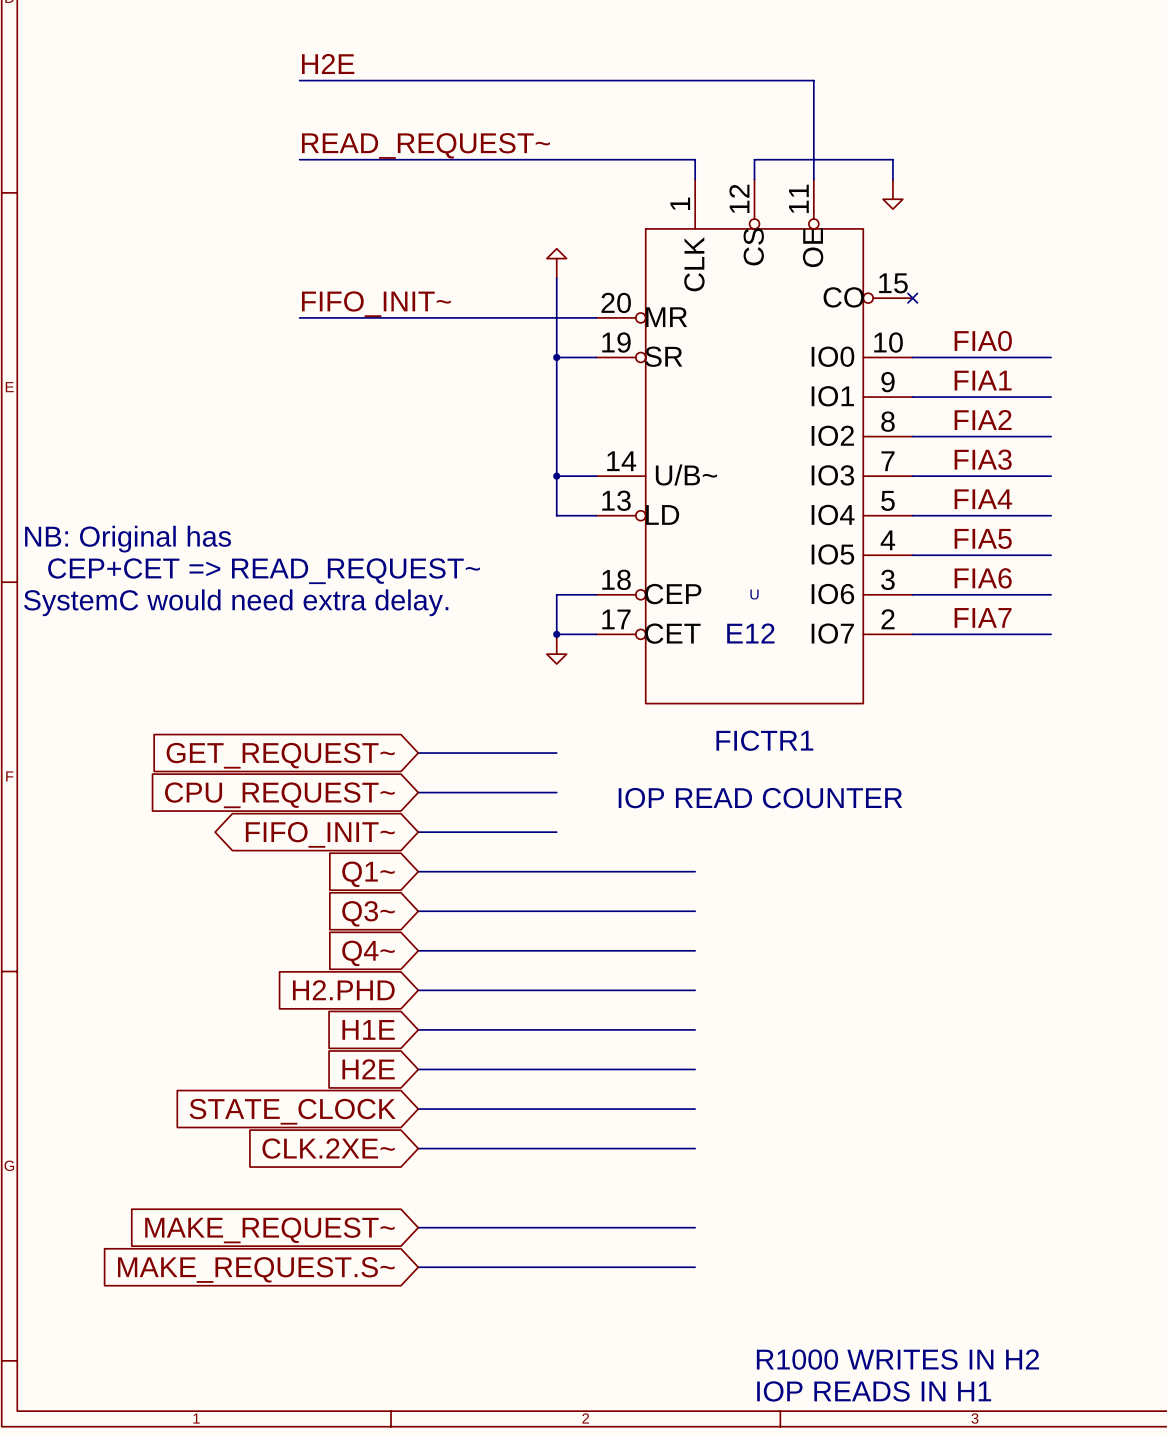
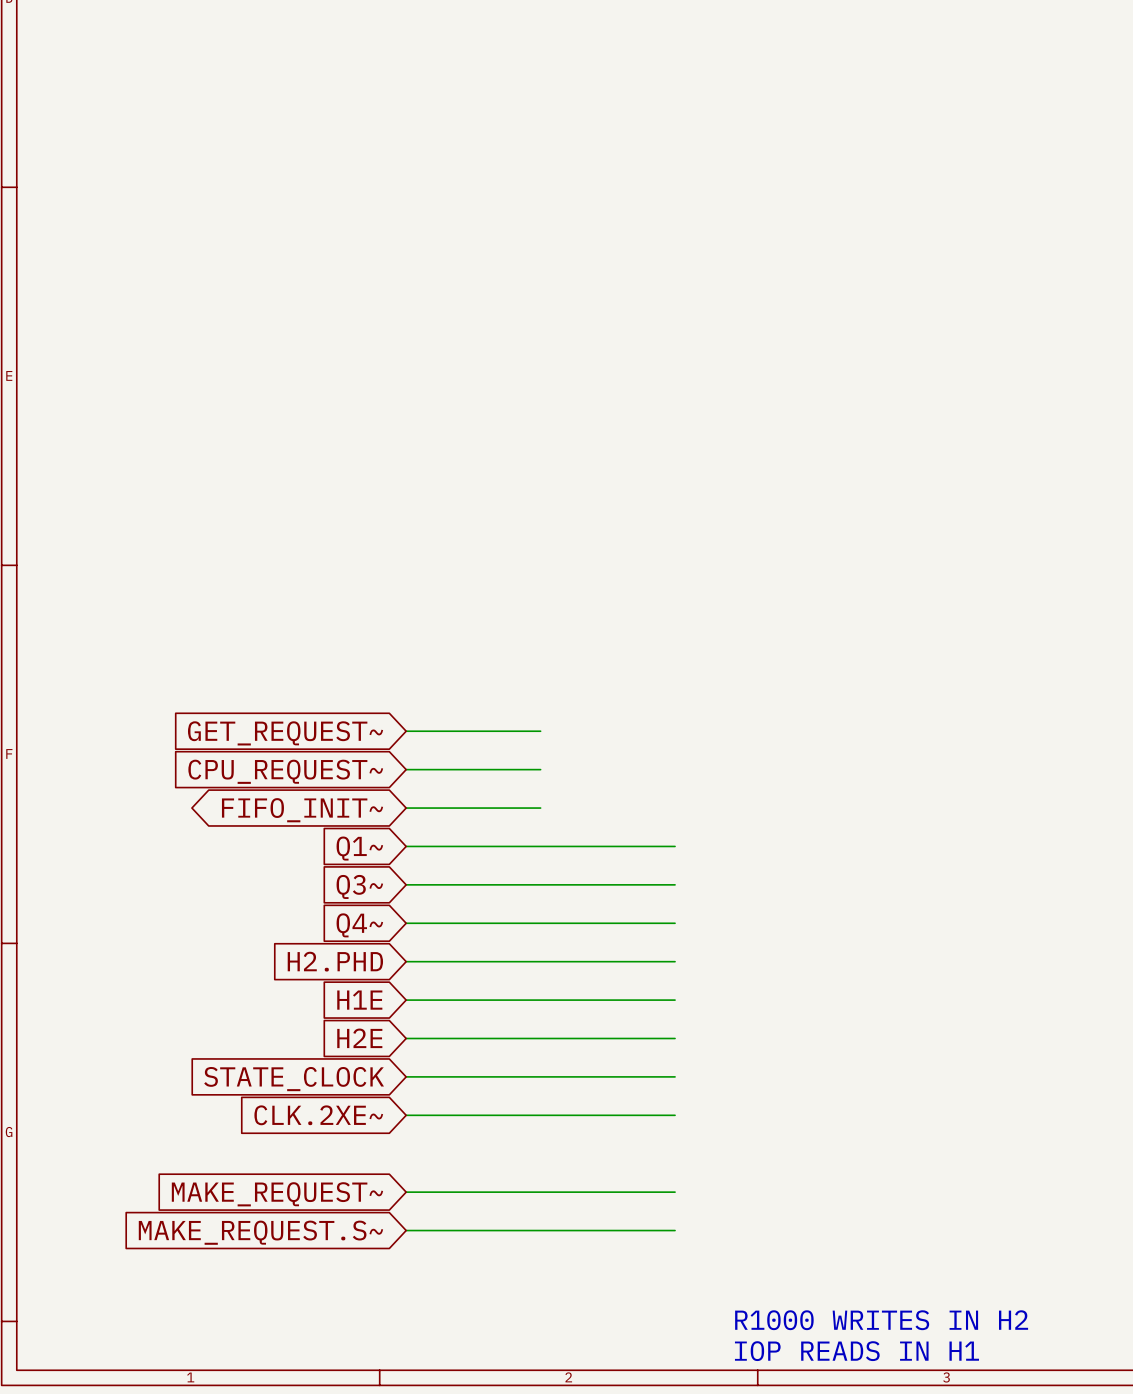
label: H2E (328, 63) -> none
wire: (299, 80) (813, 80) (813, 179) -> none
label: READ_REQUEST~ (425, 145) -> none
wire: (299, 159) (695, 159) (695, 179) -> none
wire: (754, 179) (754, 159) (892, 159) (892, 179) -> none
power symbol: (892, 194) -> none
power symbol: (556, 263) -> none
wire: (556, 278) (556, 515) (596, 515) -> none
no-connect mark: (912, 298) -> none
label: FIFO_INIT~ (376, 304) -> none
wire: (299, 317) (596, 317) -> none
label: FIA0 (983, 341) -> none
wire: (556, 357) (596, 357) -> none
junction: (556, 357) -> none
wire: (912, 357) (1051, 357) -> none
label: FIA1 (983, 380) -> none
wire: (912, 397) (1051, 397) -> none
label: FIA2 (983, 419) -> none
wire: (912, 436) (1051, 436) -> none
U: (754, 441) -> none
label: FIA3 (983, 459) -> none
wire: (556, 476) (596, 476) -> none
junction: (556, 476) -> none
wire: (912, 476) (1051, 476) -> none
label: FIA4 (983, 499) -> none
wire: (912, 515) (1051, 515) -> none
label: FIA5 (983, 538) -> none
text: NB: Original has (128, 539) -> none
wire: (912, 555) (1051, 555) -> none
text: CEP+CET => READ_REQUEST~ (264, 571) -> none
label: FIA6 (983, 578) -> none
wire: (596, 594) (556, 594) (556, 634) (596, 634) -> none
wire: (912, 594) (1051, 594) -> none
text: SystemC would need extra delay. (236, 602) -> none
label: FIA7 (983, 617) -> none
junction: (556, 634) -> none
wire: (912, 634) (1051, 634) -> none
power symbol: (556, 649) -> none
text: IOP READ COUNTER (760, 798) -> none

